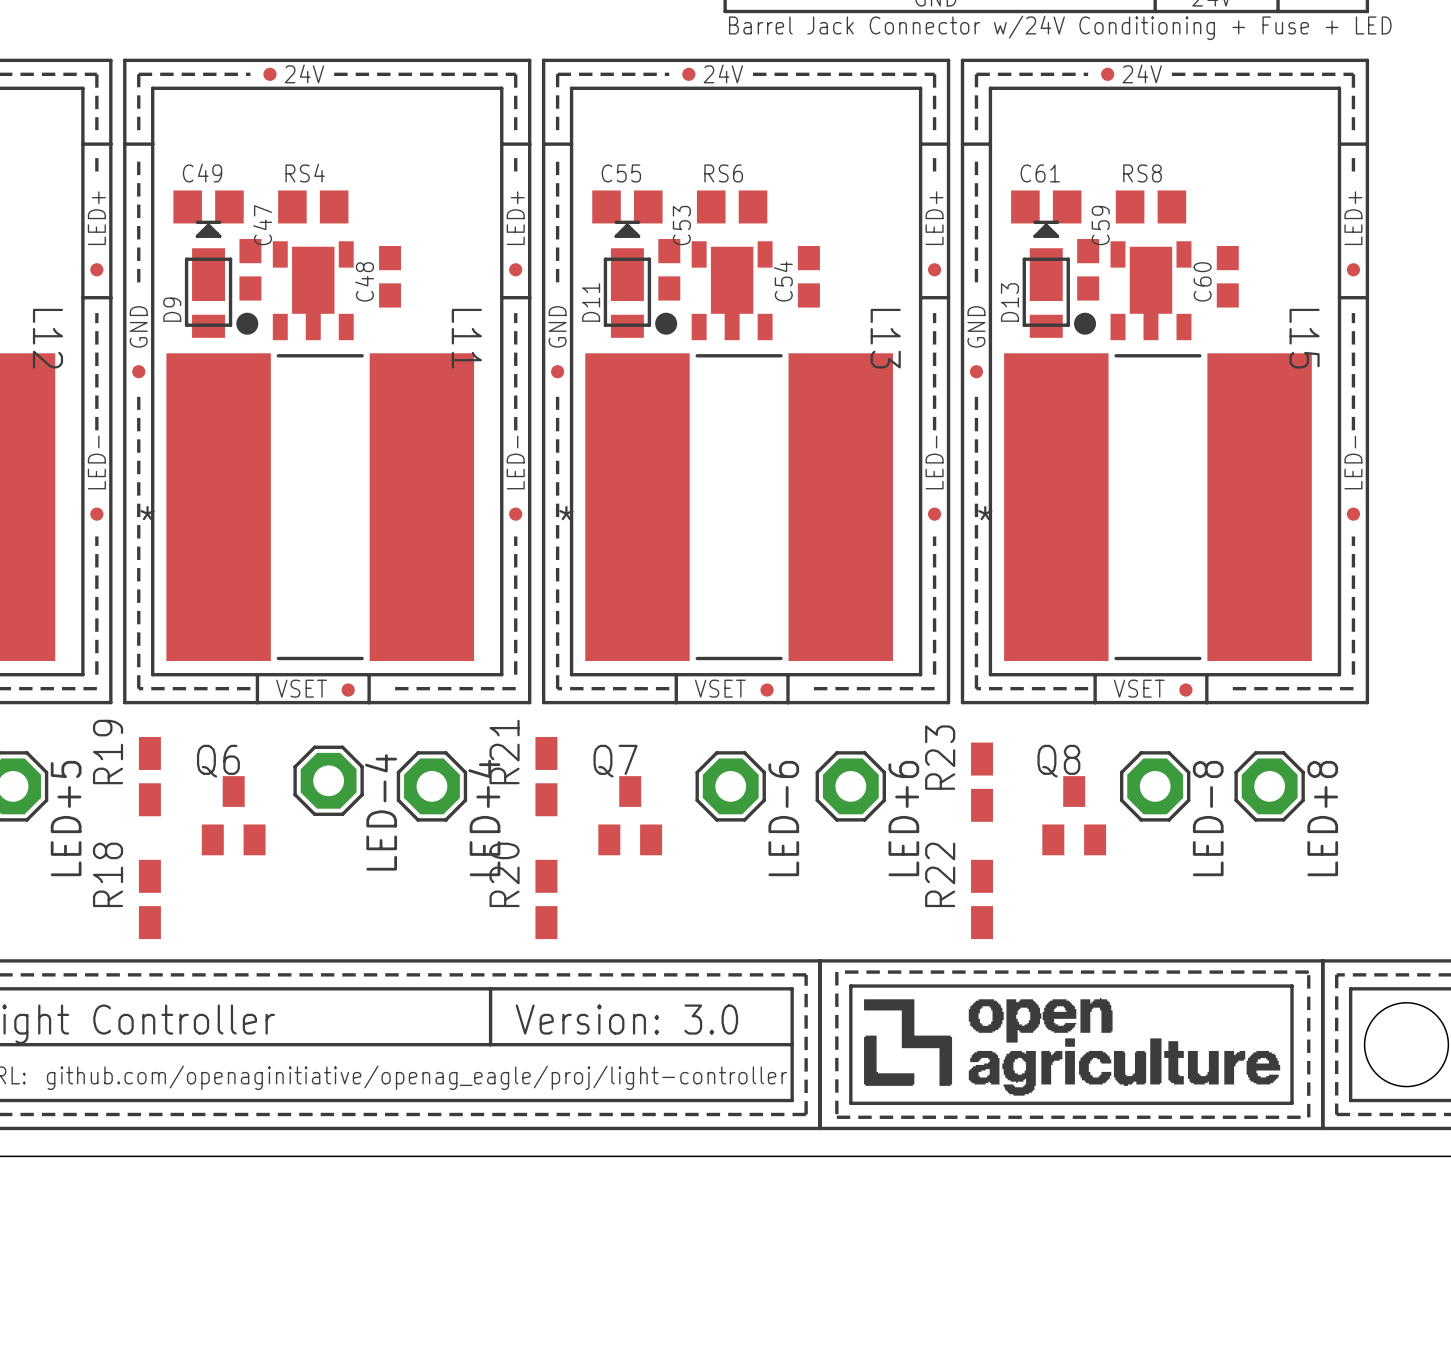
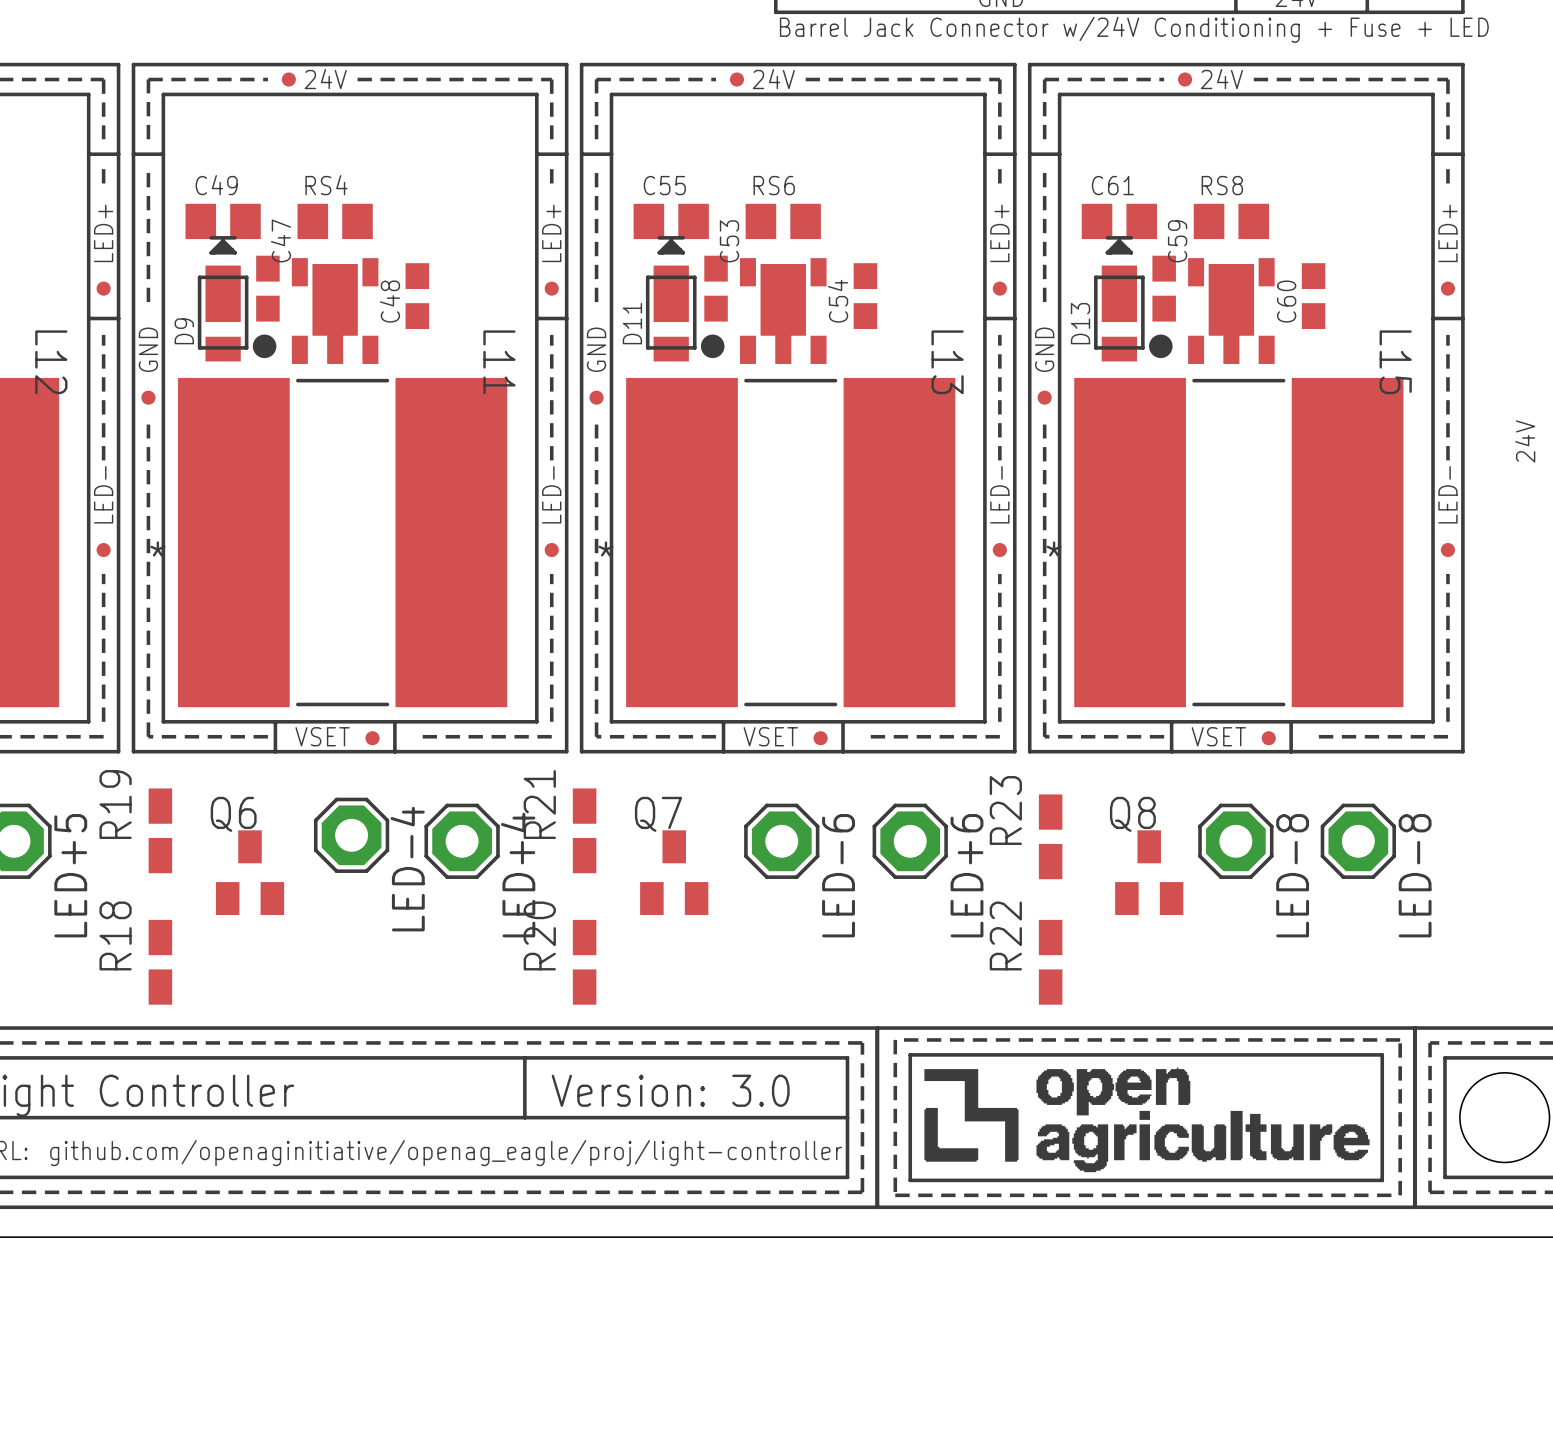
text: none -> 24V (1525, 441)
LED+8 name: LED+8 (1322, 818) -> LED-8 (1415, 875)

